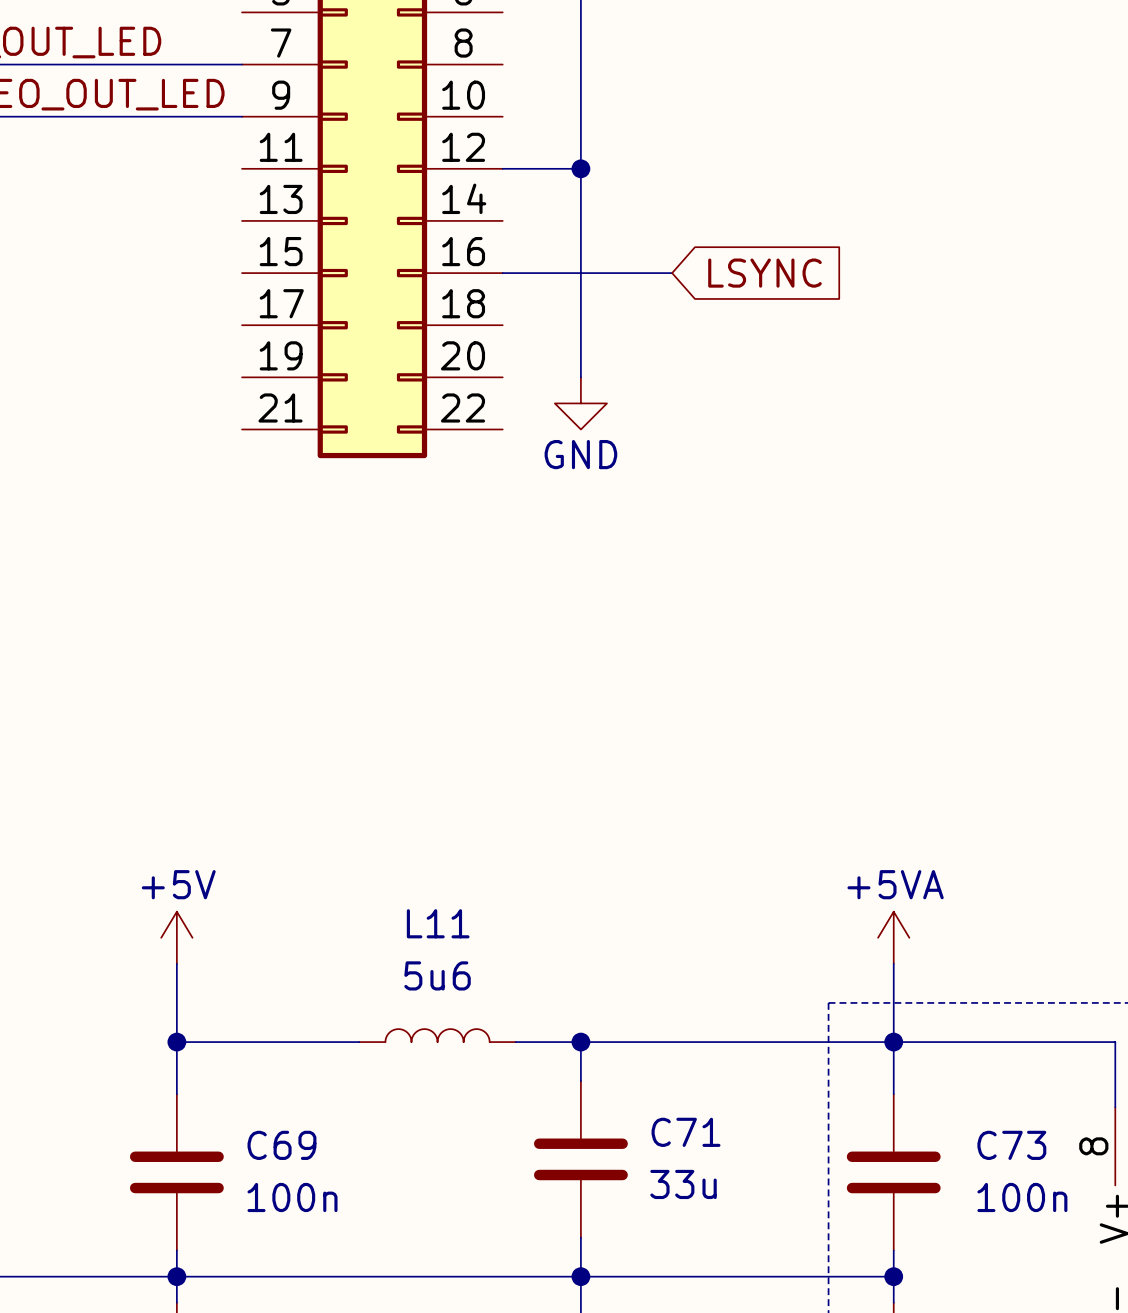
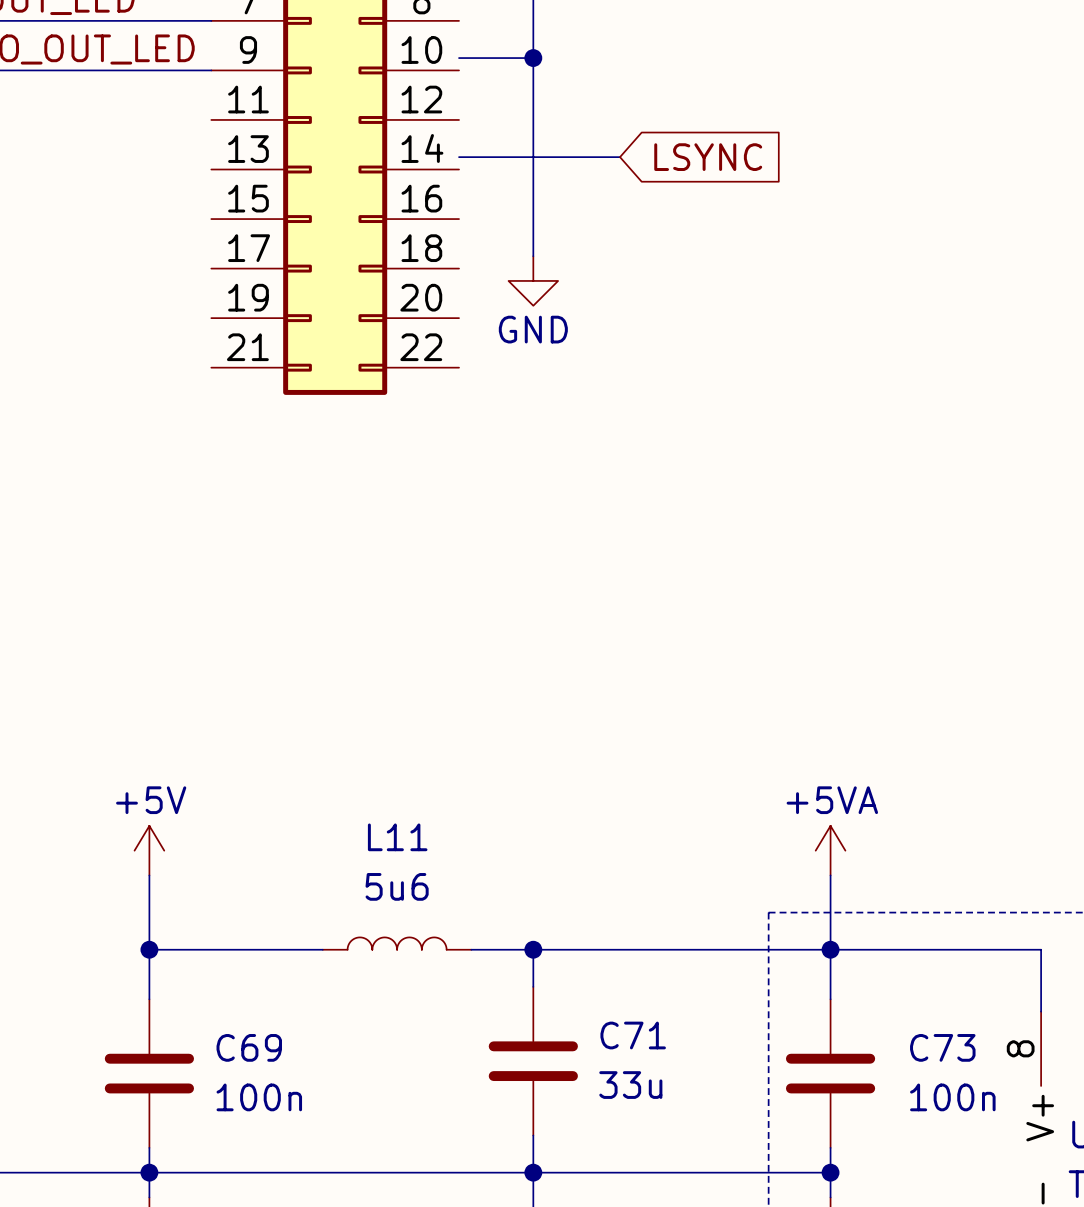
wire: (502, 168) (580, 168) -> (459, 58) (533, 58)
junction position: (580, 168) -> (533, 58)
wire: (502, 273) (672, 273) -> (459, 157) (620, 157)
global label position: LSYNC (764, 273) -> LSYNC (708, 157)
wire: (580, 312) (580, 377) -> none
power symbol position: GND (580, 403) -> GND (533, 280)

